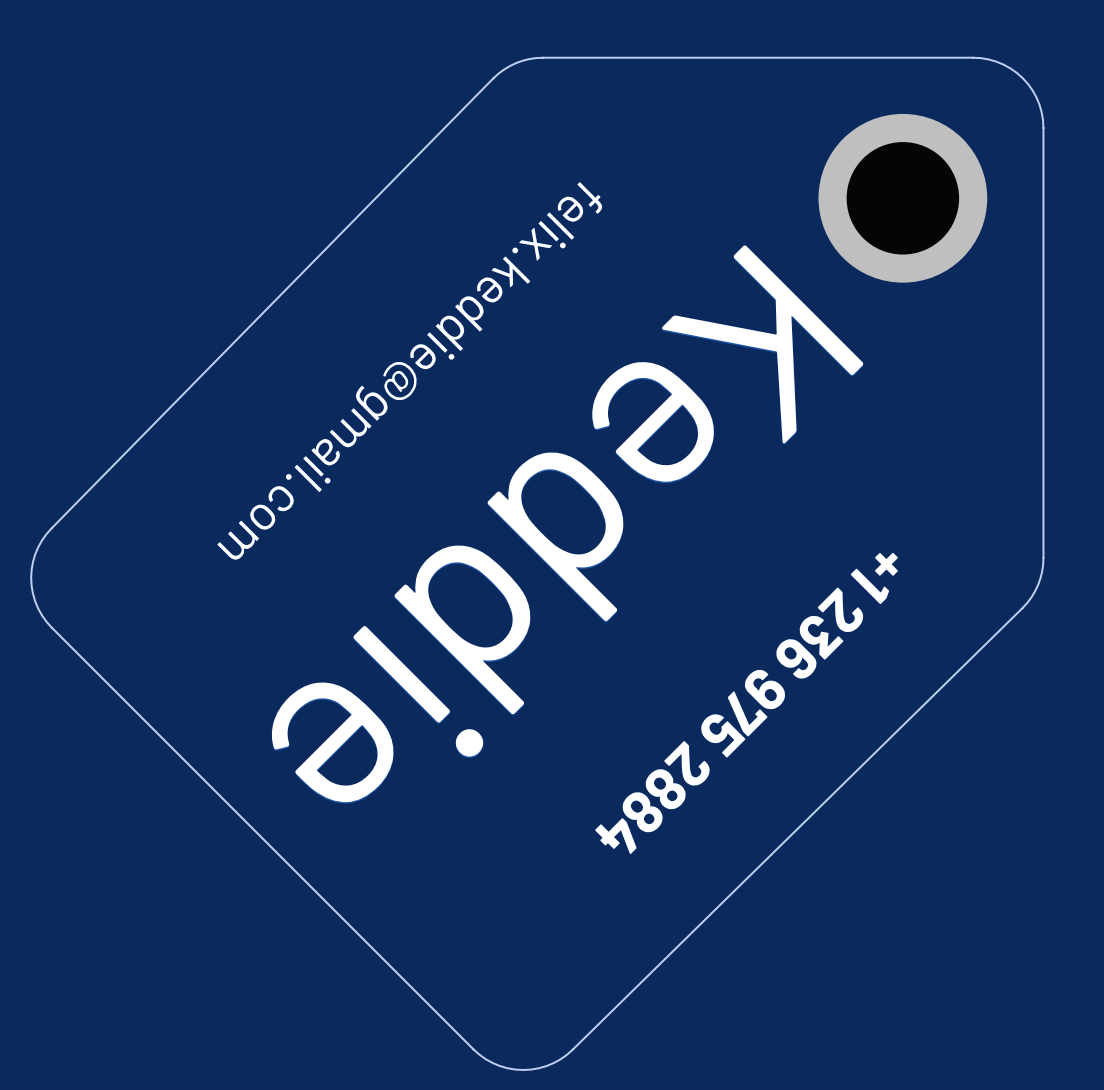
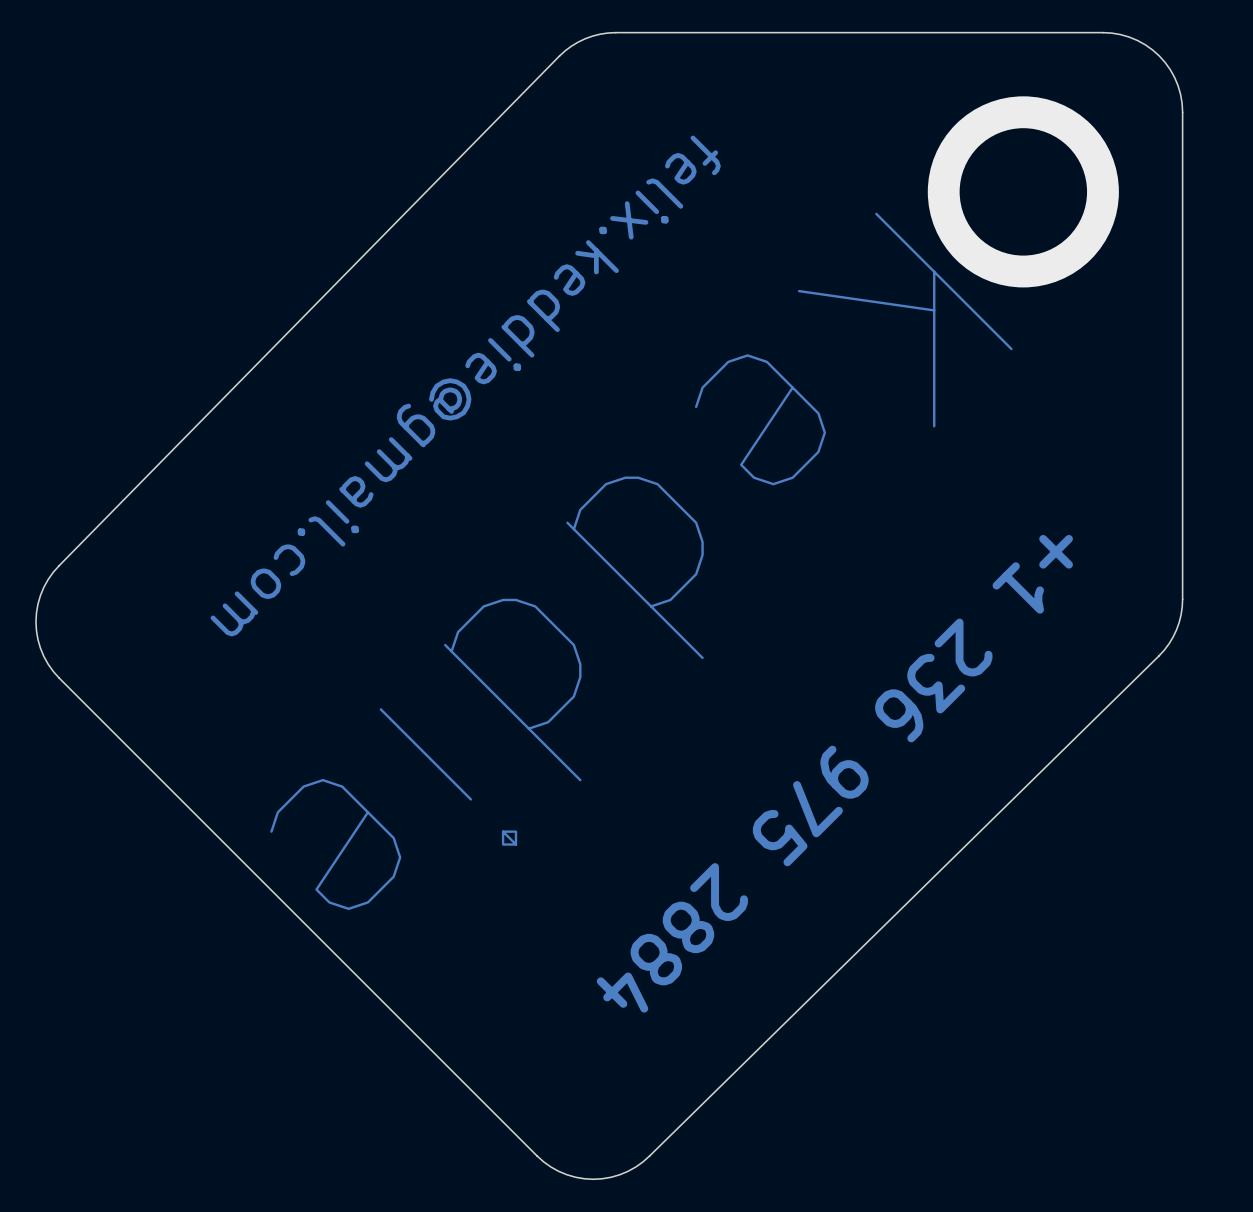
text: felix.keddie@gmail.com (409, 370) -> none
text: Keddie (567, 523) -> none
text: +1 236 975 2884 (746, 703) -> none

